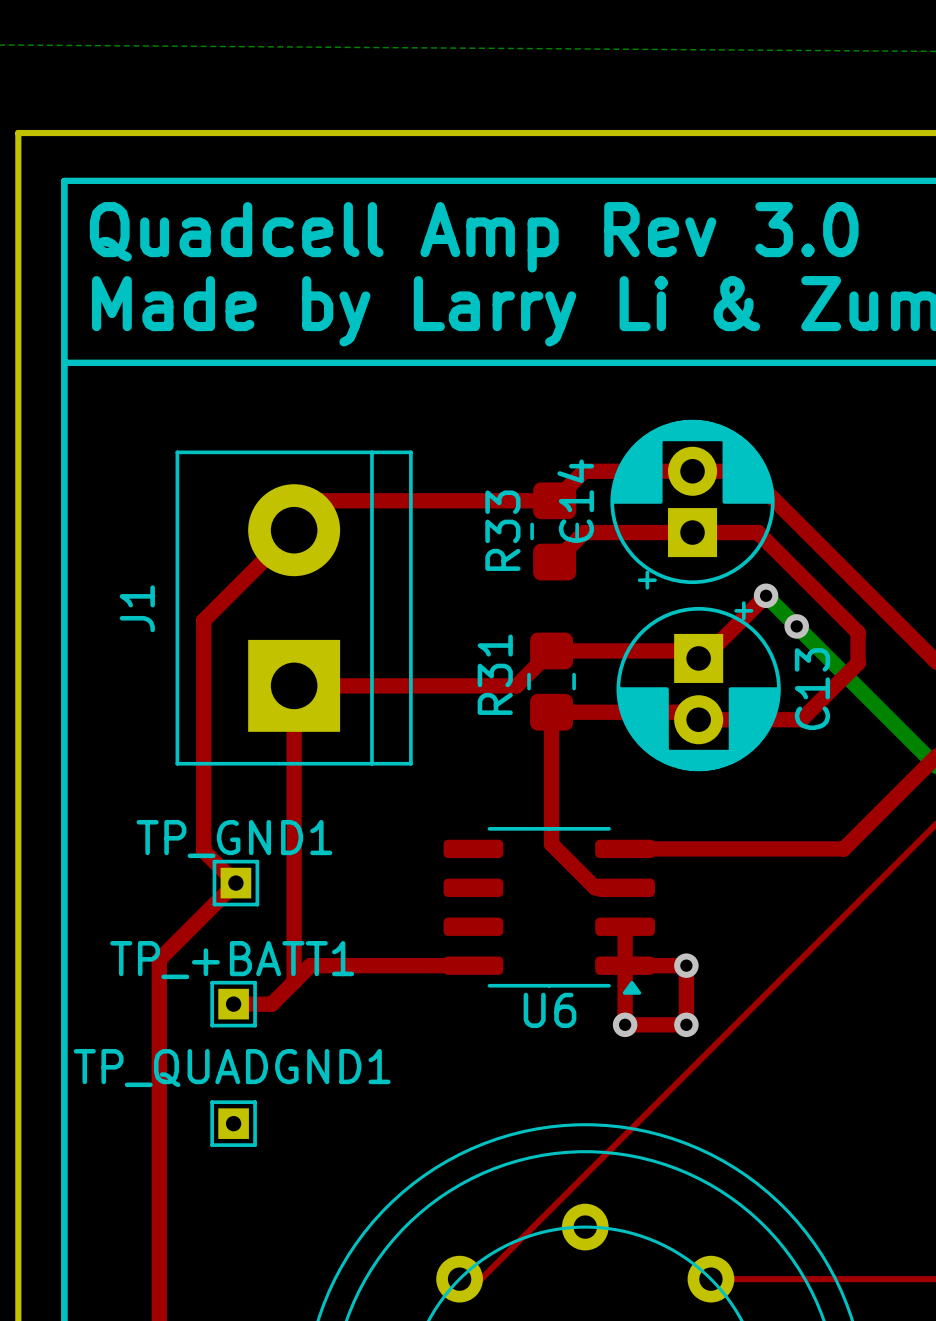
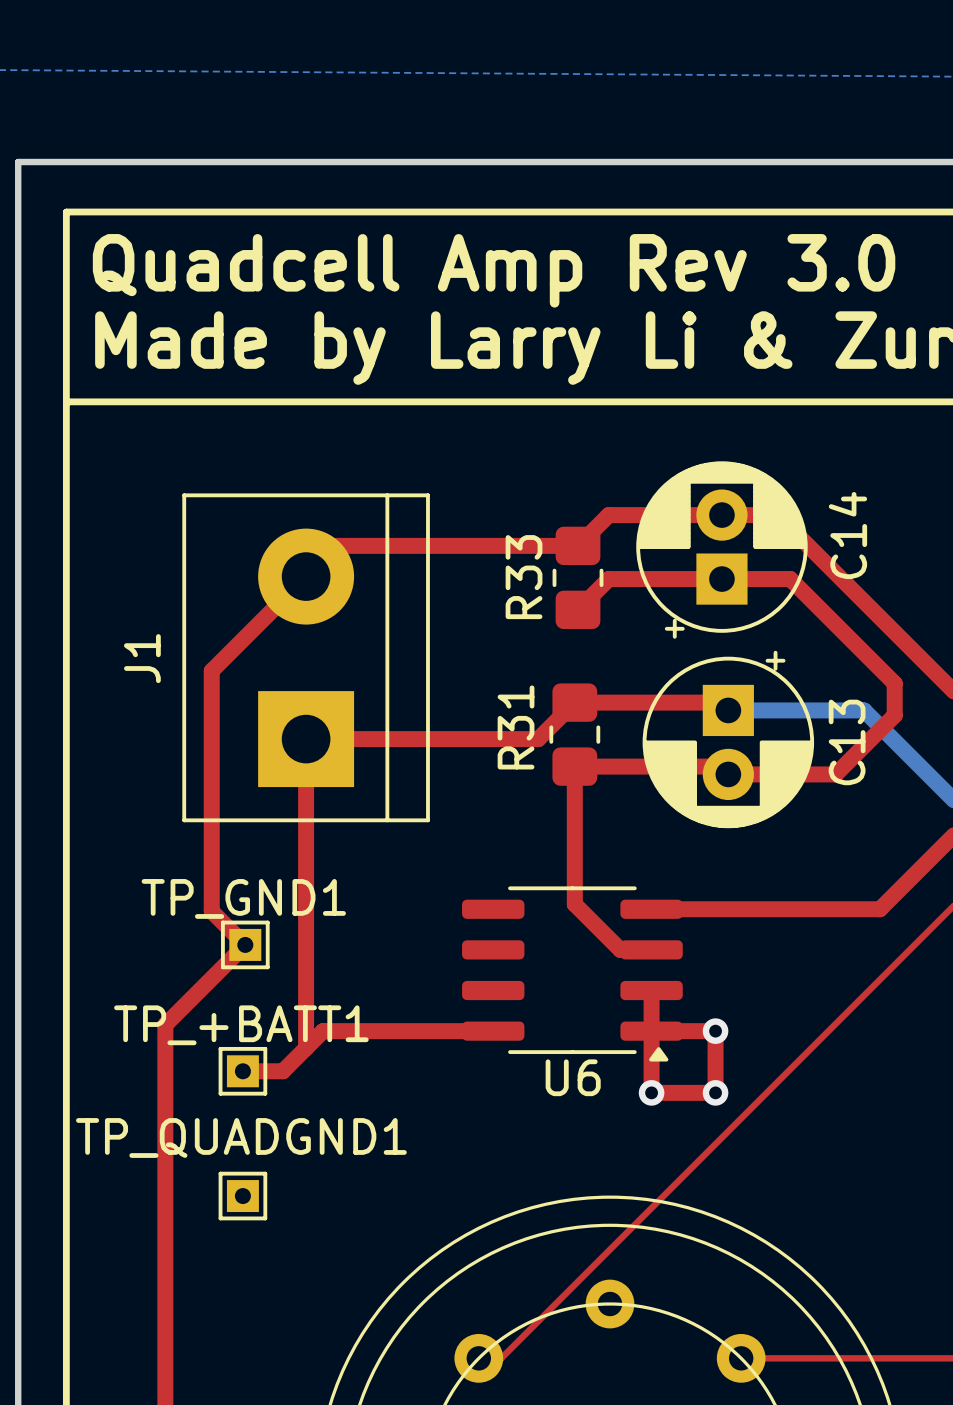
C14 name position: C14 (575, 501) -> C14 (847, 535)
top track: (766, 595) (703, 658) -> none
bottom track: (766, 595) (828, 658) -> (728, 710) (864, 710)
via: (766, 595) -> none
via: (796, 626) -> none

